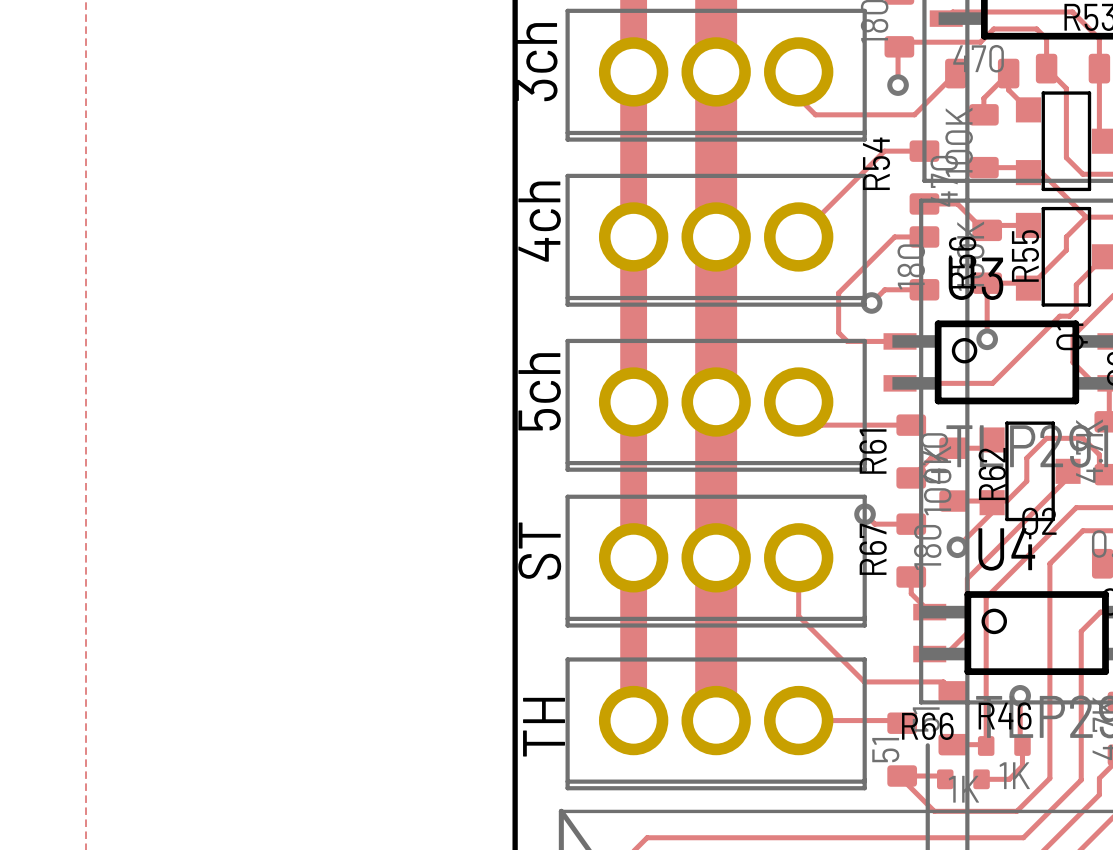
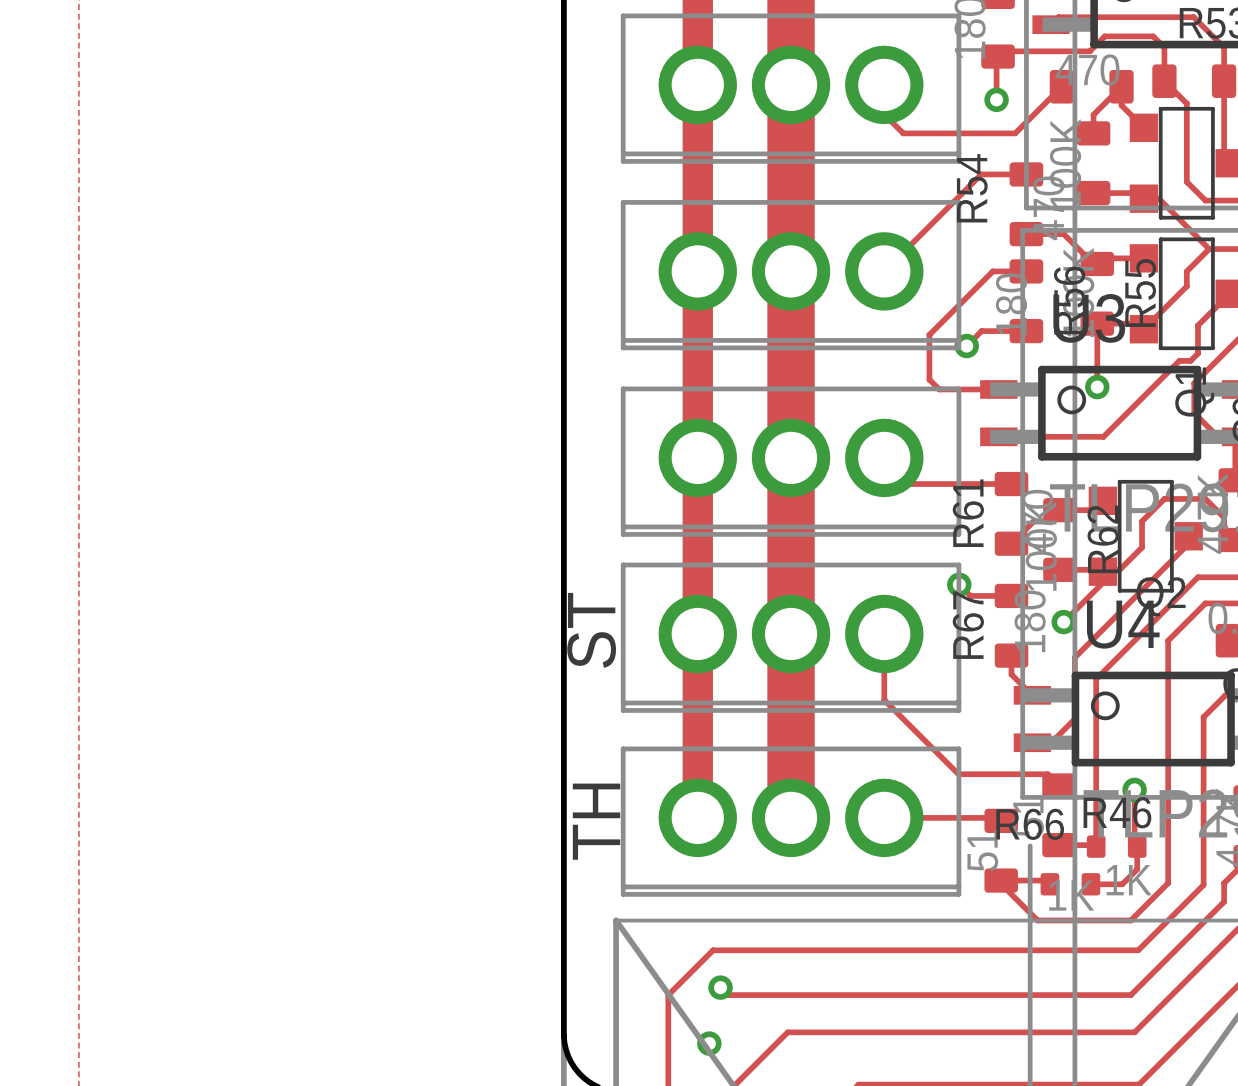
text: 3ch (536, 62) -> none
text: 4ch (539, 221) -> none
text: 5ch (539, 391) -> none

